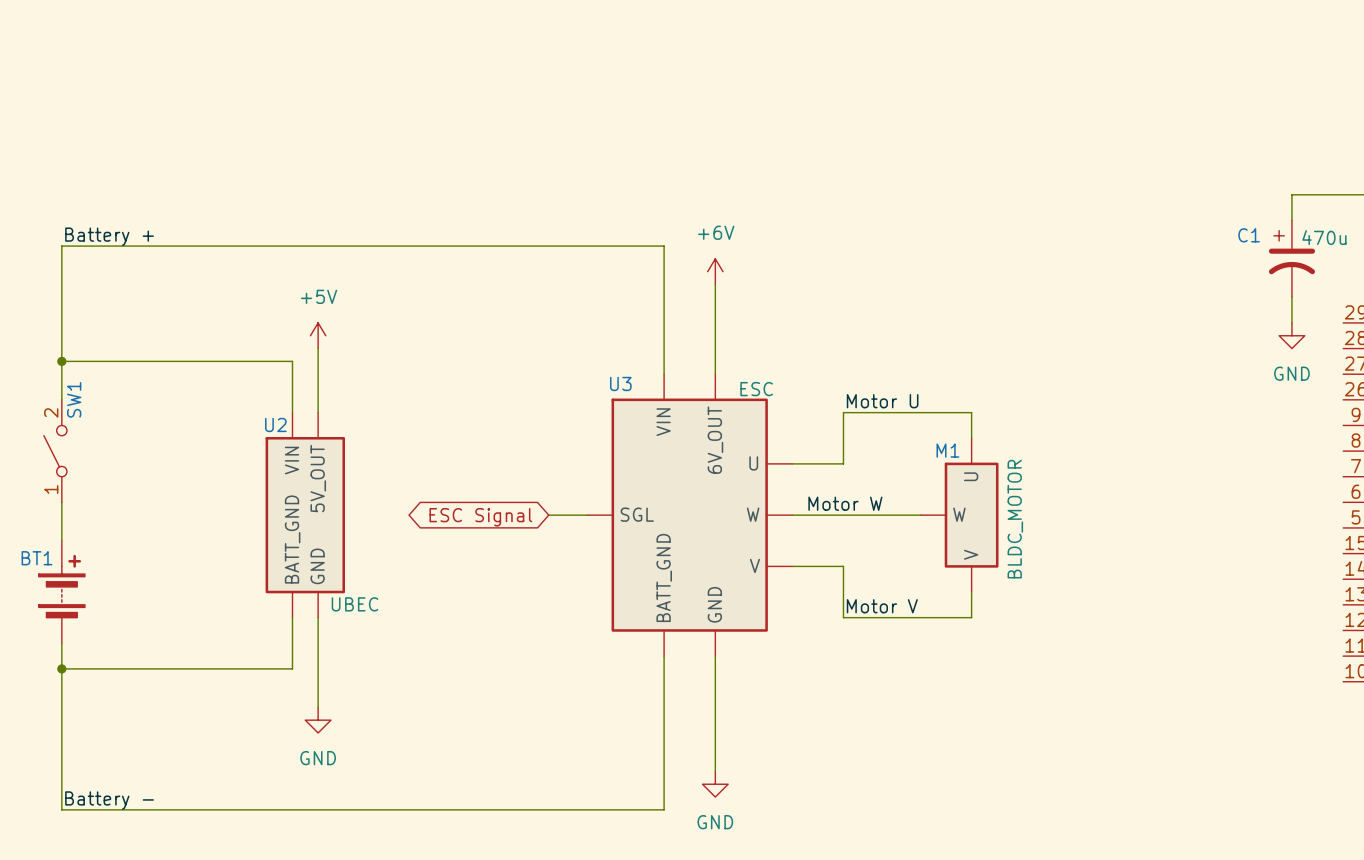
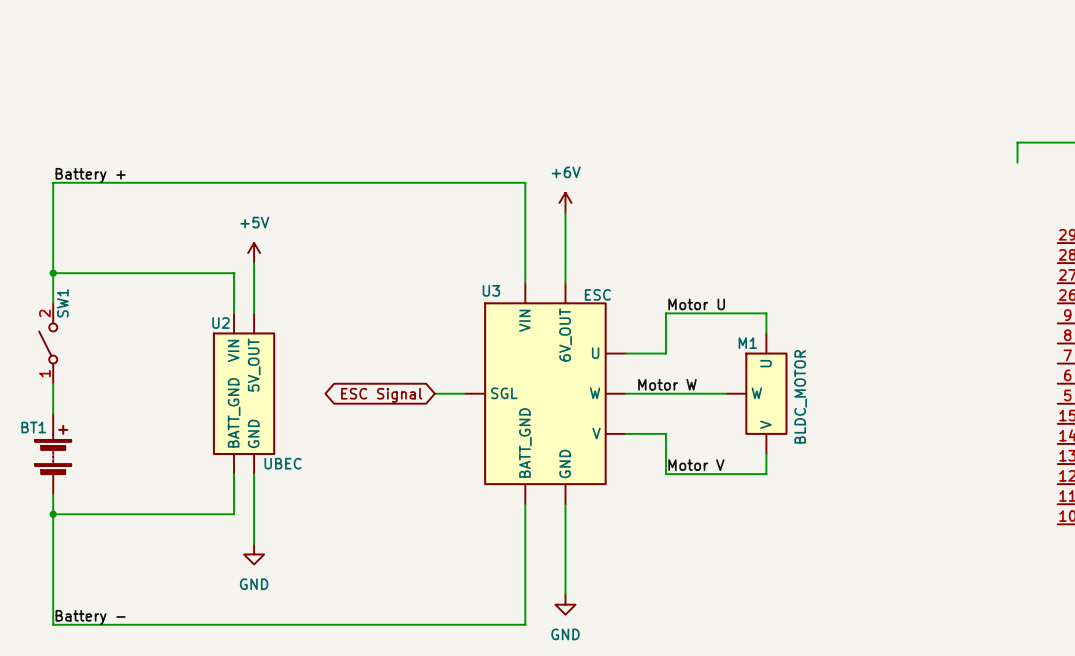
C1: 470u (1291, 258) -> none
wire: (1291, 297) (1291, 322) -> none
power symbol: GND (1291, 335) -> none

